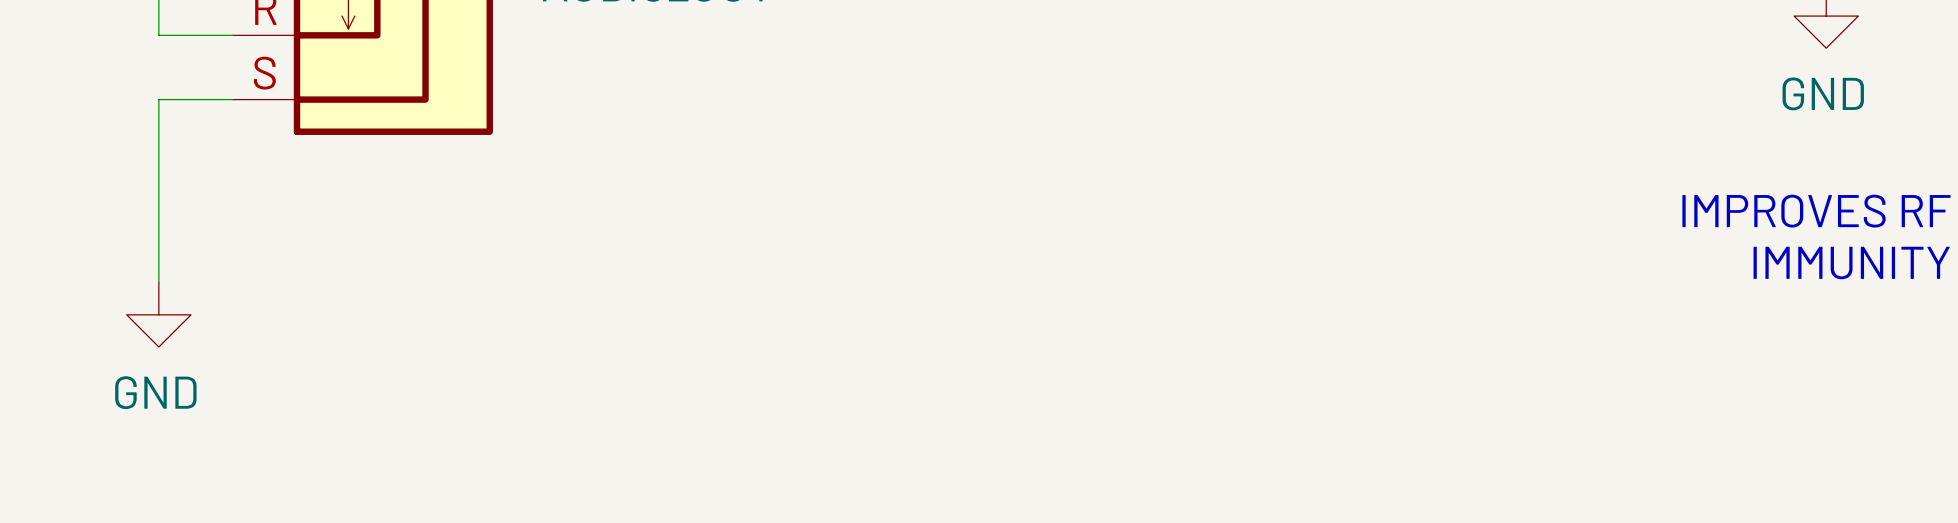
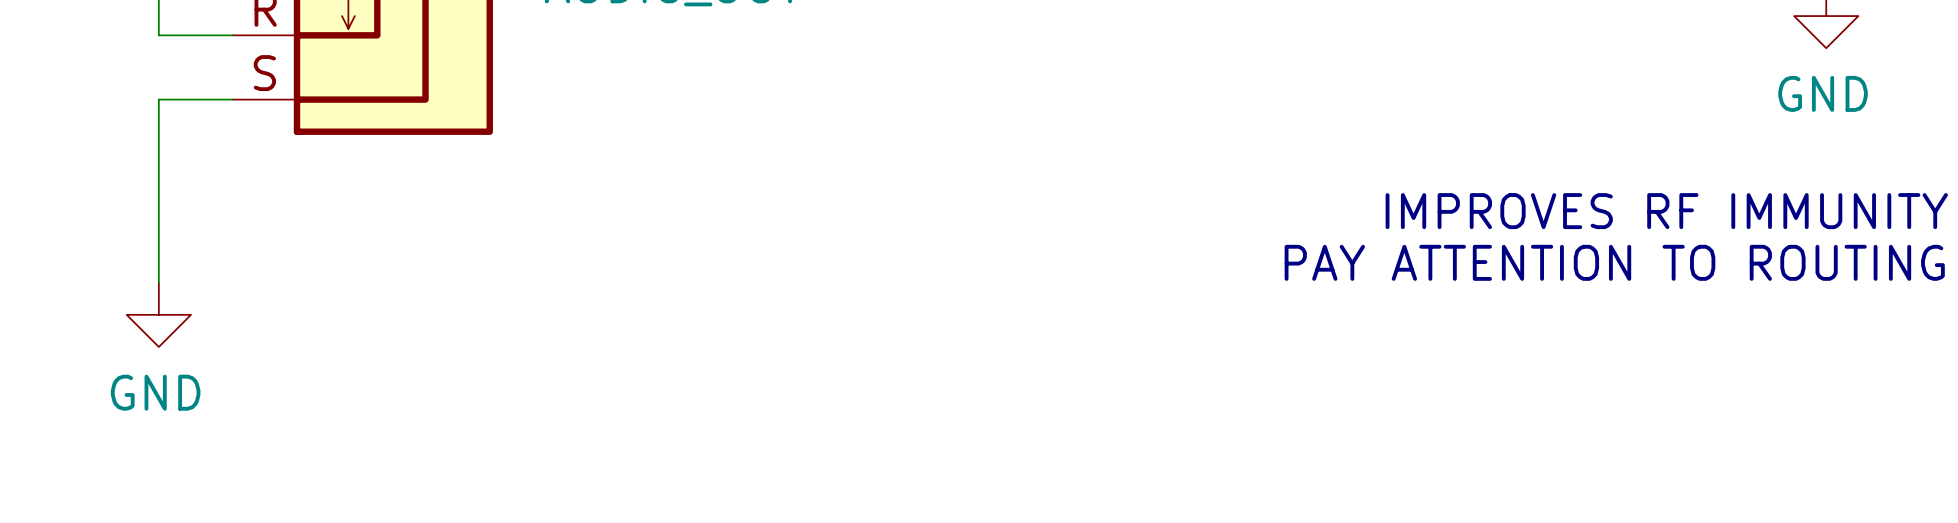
text: IMPROVES RF (1816, 211) -> IMPROVES RF IMMUNITY (1666, 211)
text: IMMUNITY (1851, 263) -> PAY ATTENTION TO ROUTING (1614, 262)

